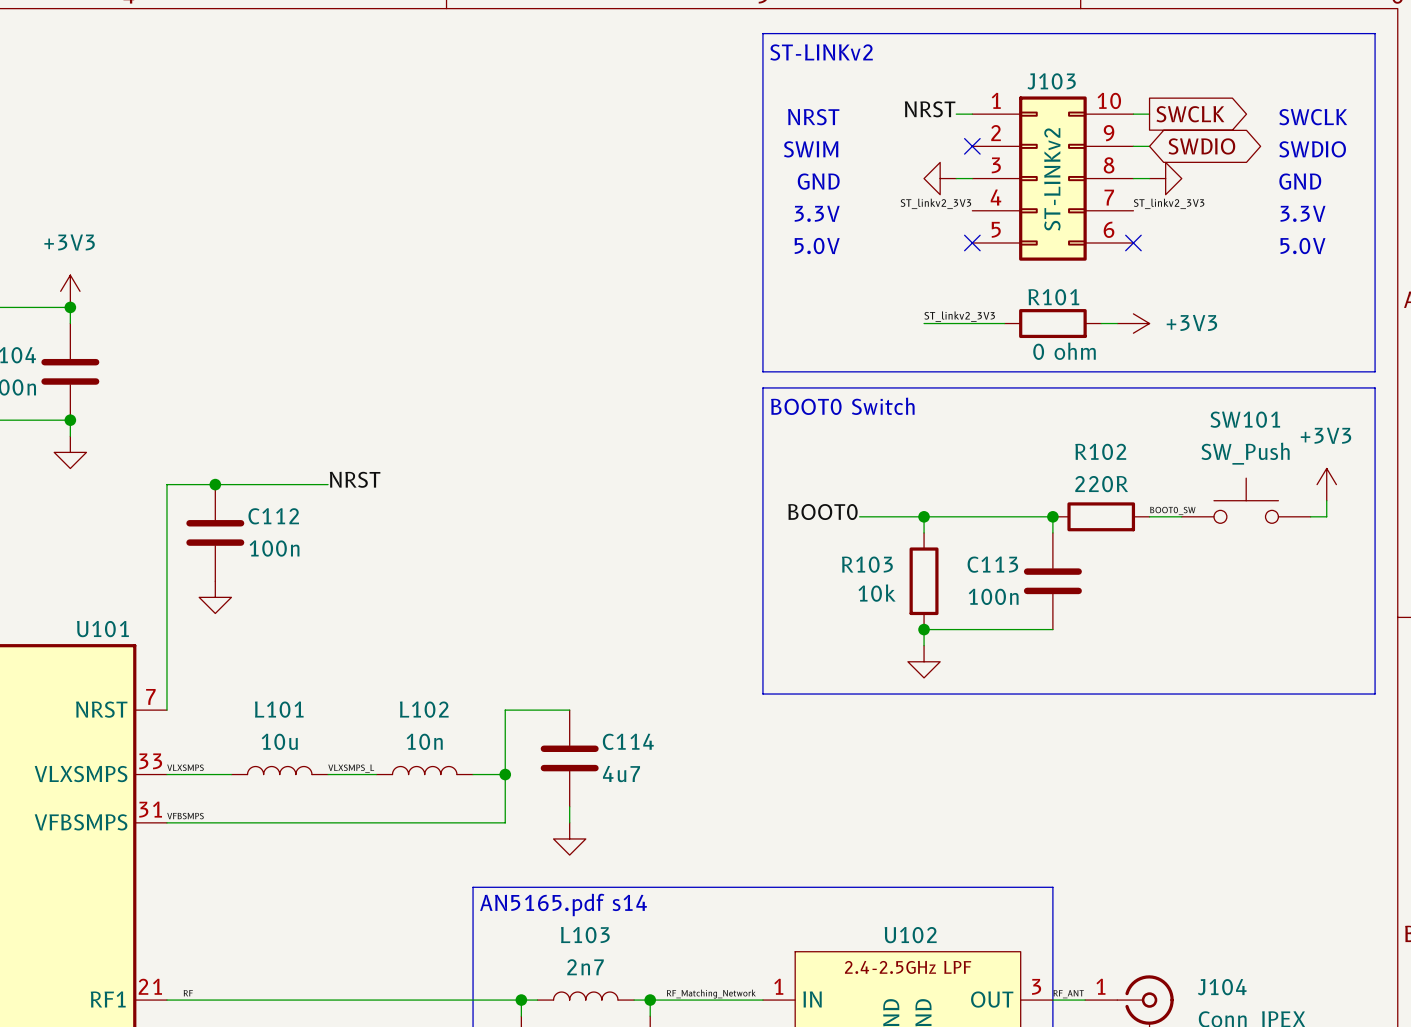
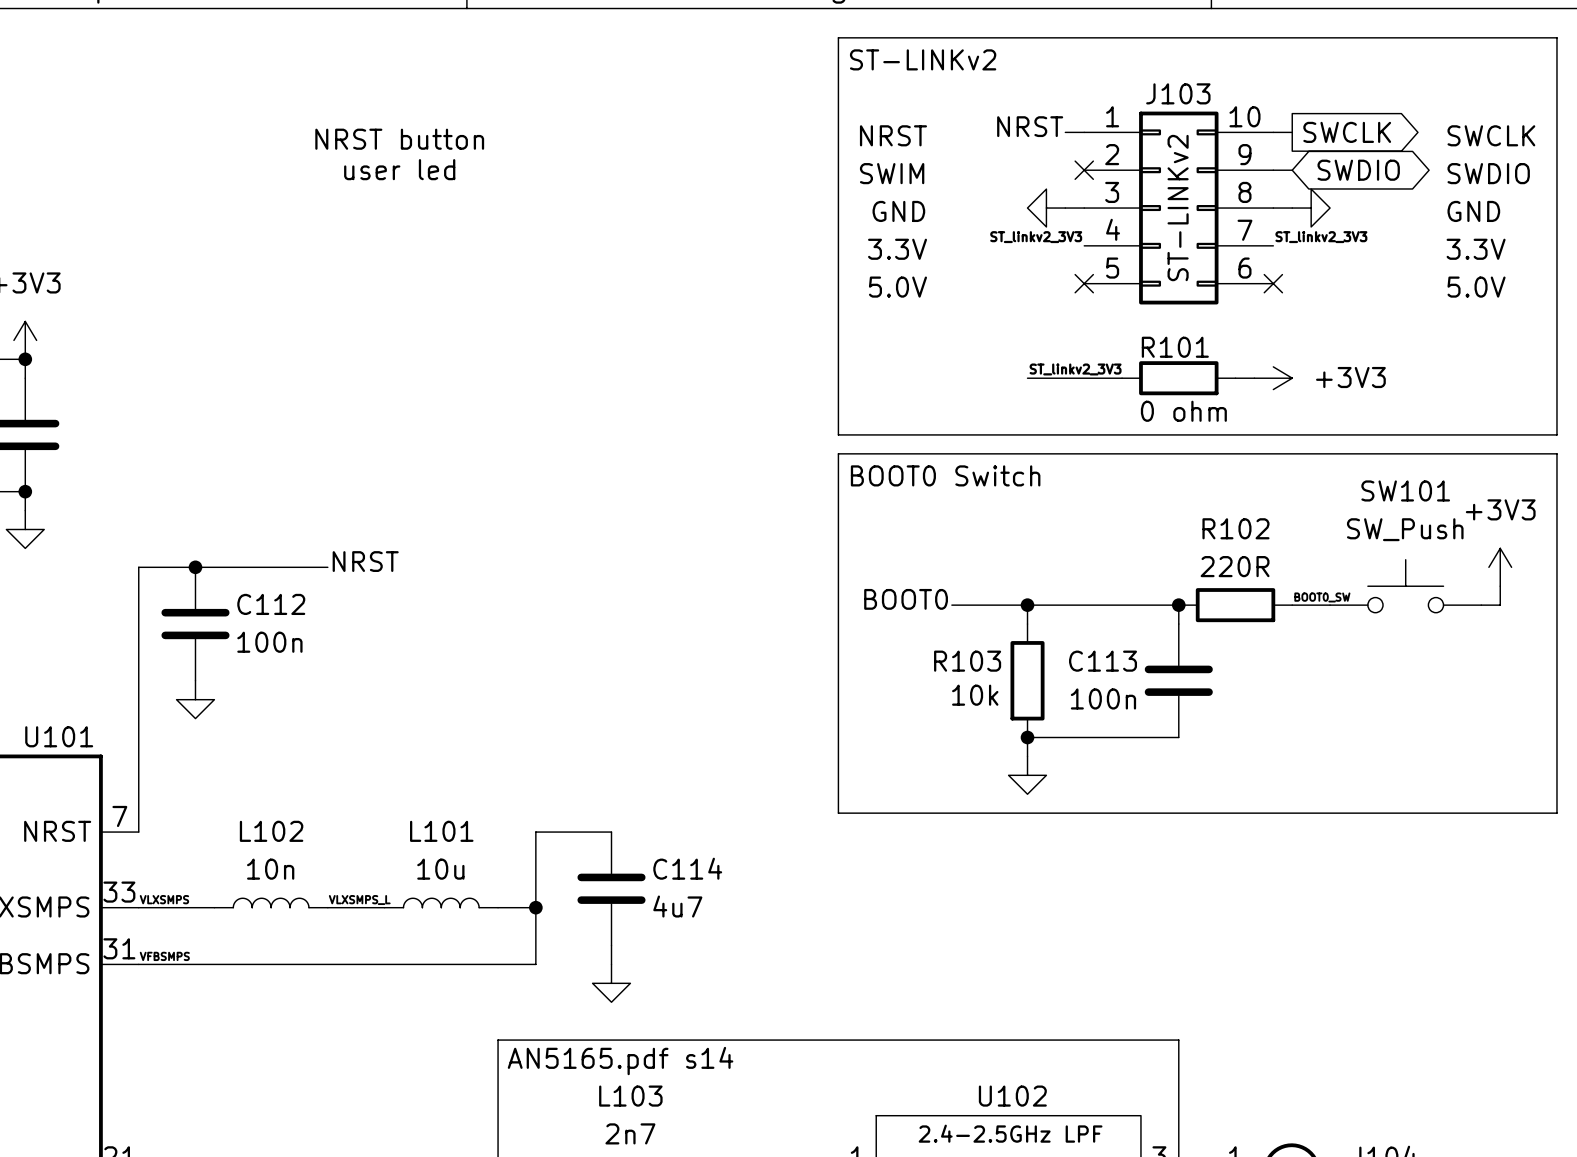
text: none -> NRST button (399, 139)
text: none -> user led (399, 169)
L101 name: L101 (279, 709) -> L102 (271, 831)
L102 name: L102 (424, 709) -> L101 (441, 831)
L101 value: 10u (279, 741) -> 10n (270, 869)
L102 value: 10n (424, 741) -> 10u (440, 869)

